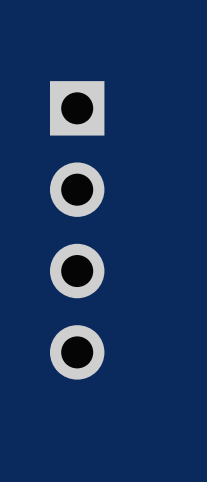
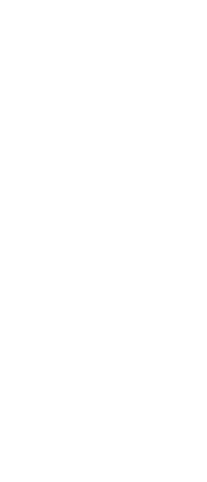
part: (77, 230) -> none

